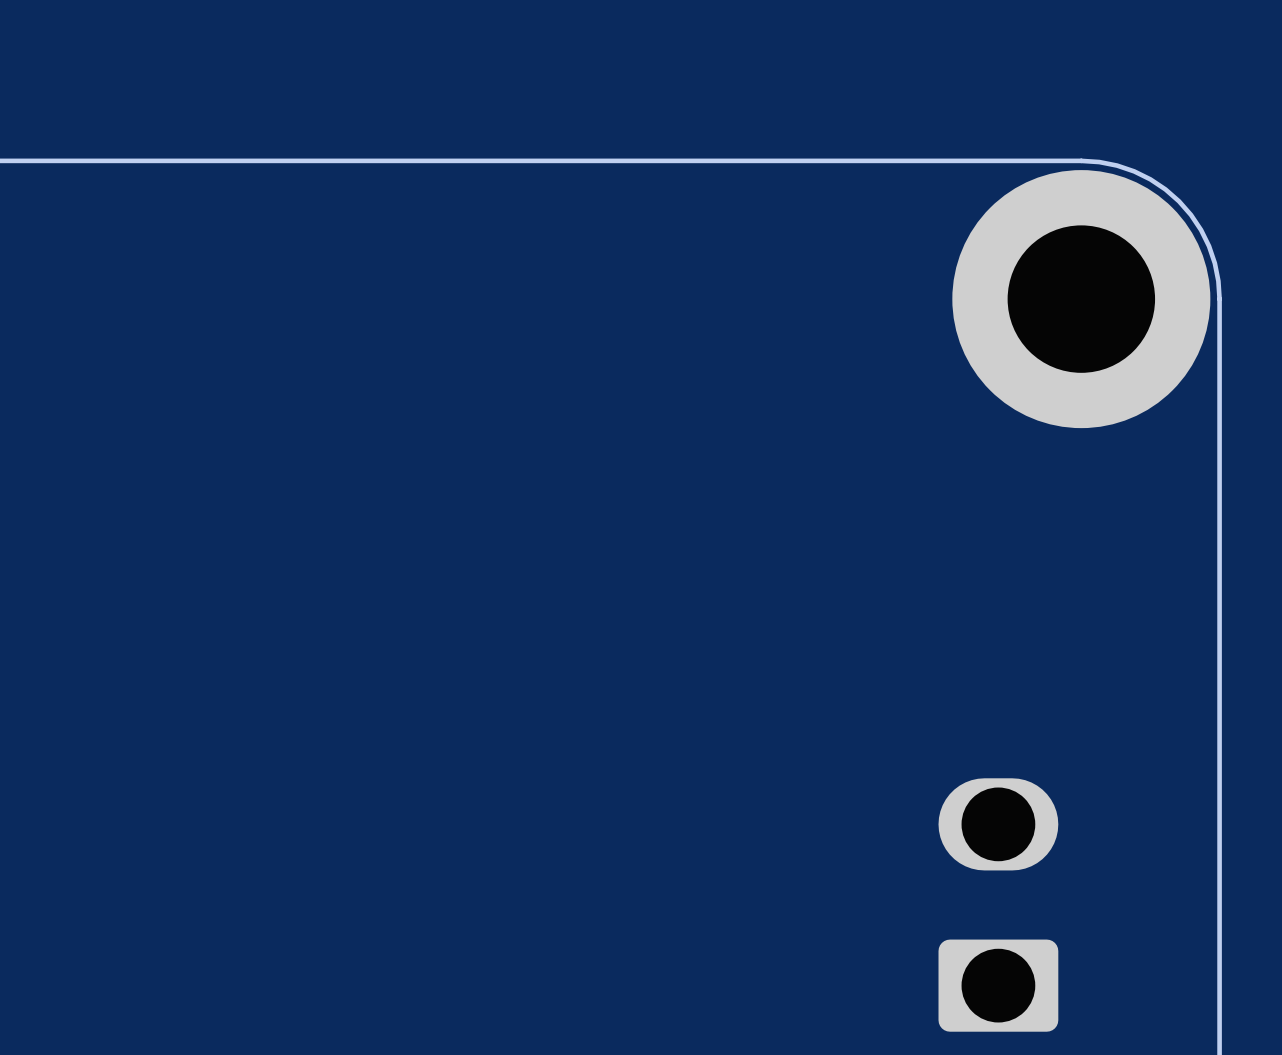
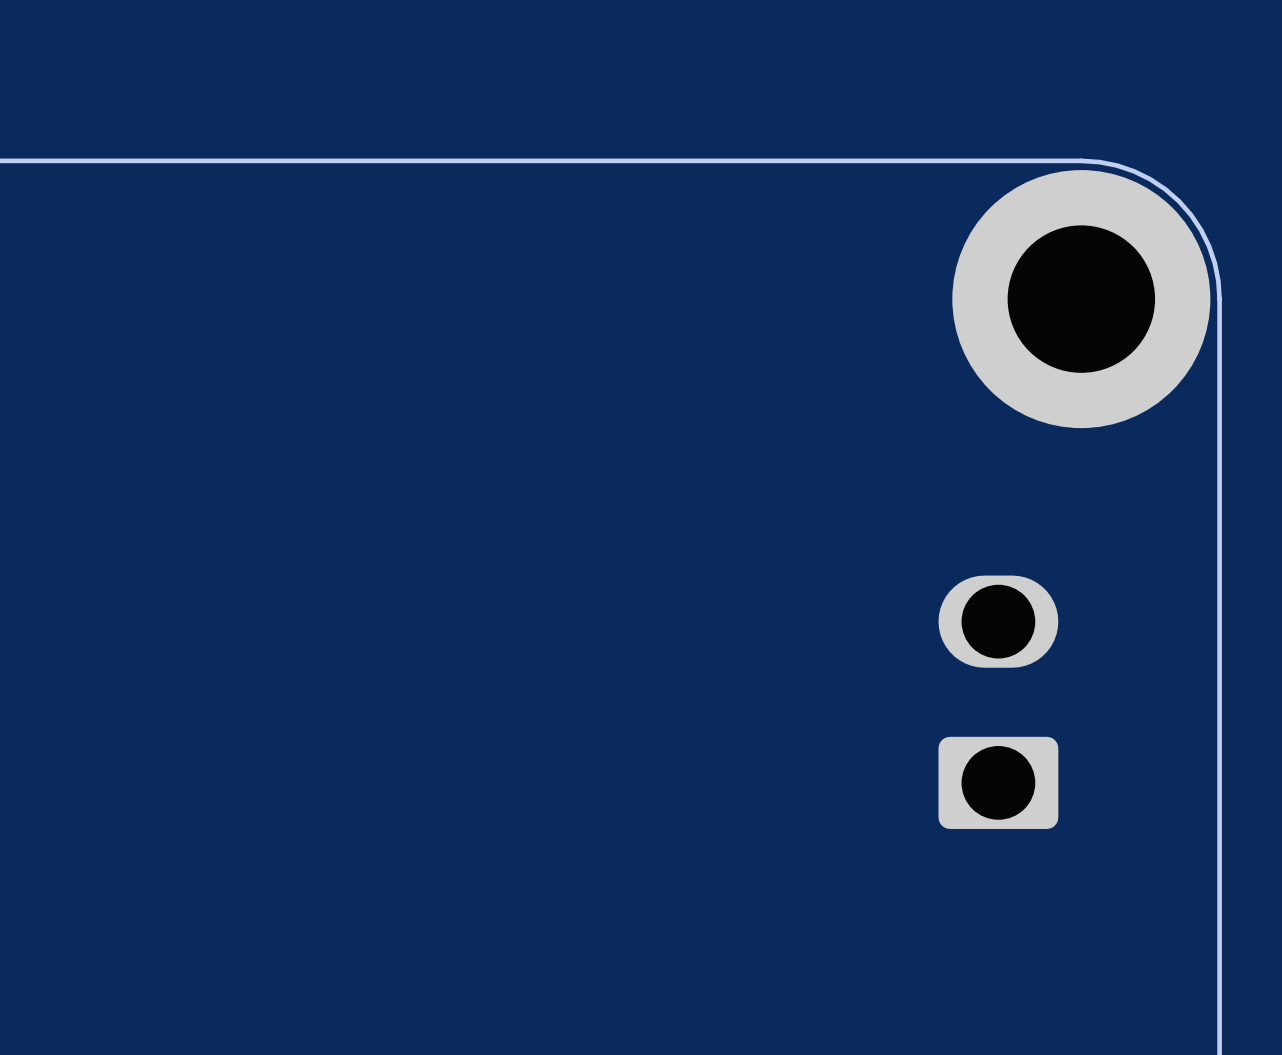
part position: (998, 905) -> (998, 702)

